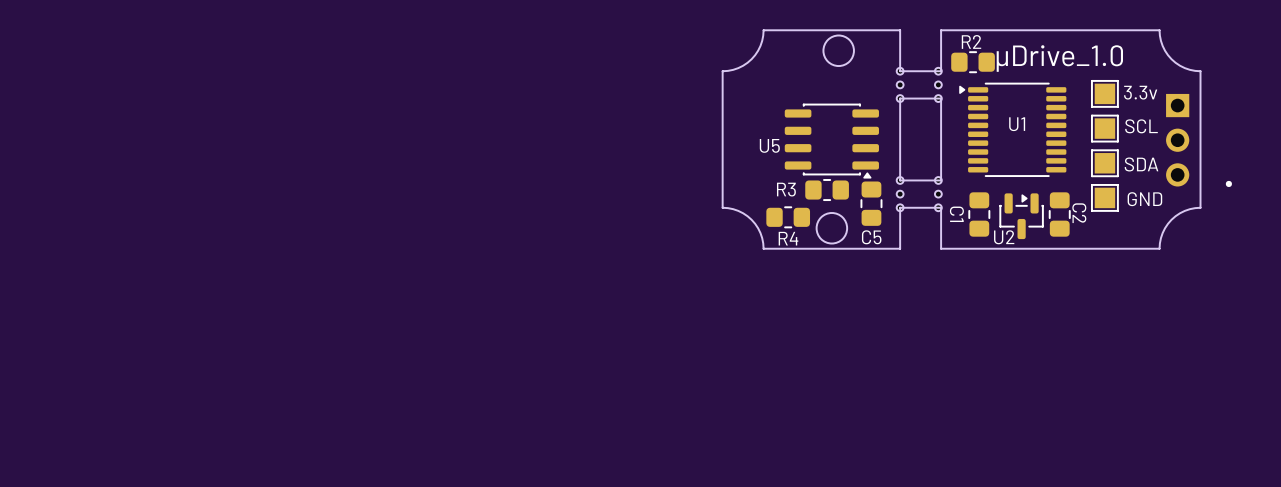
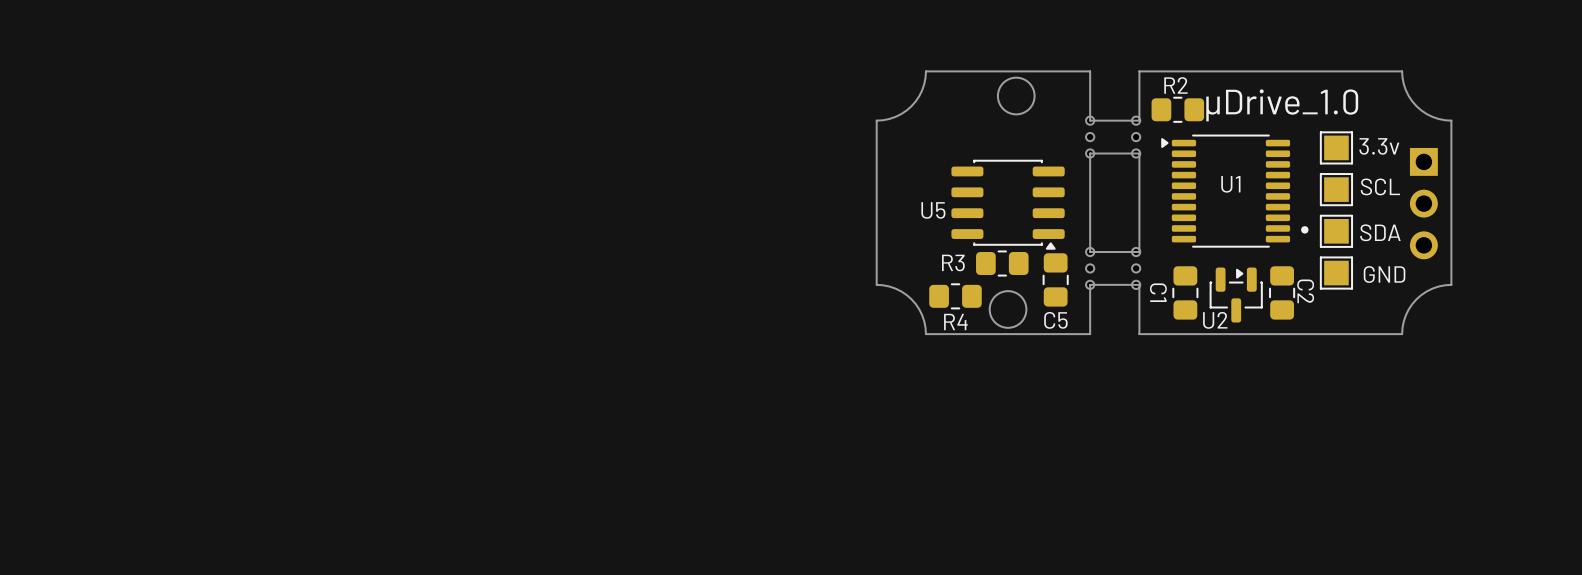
text position: . (1228, 183) -> . (1304, 229)

